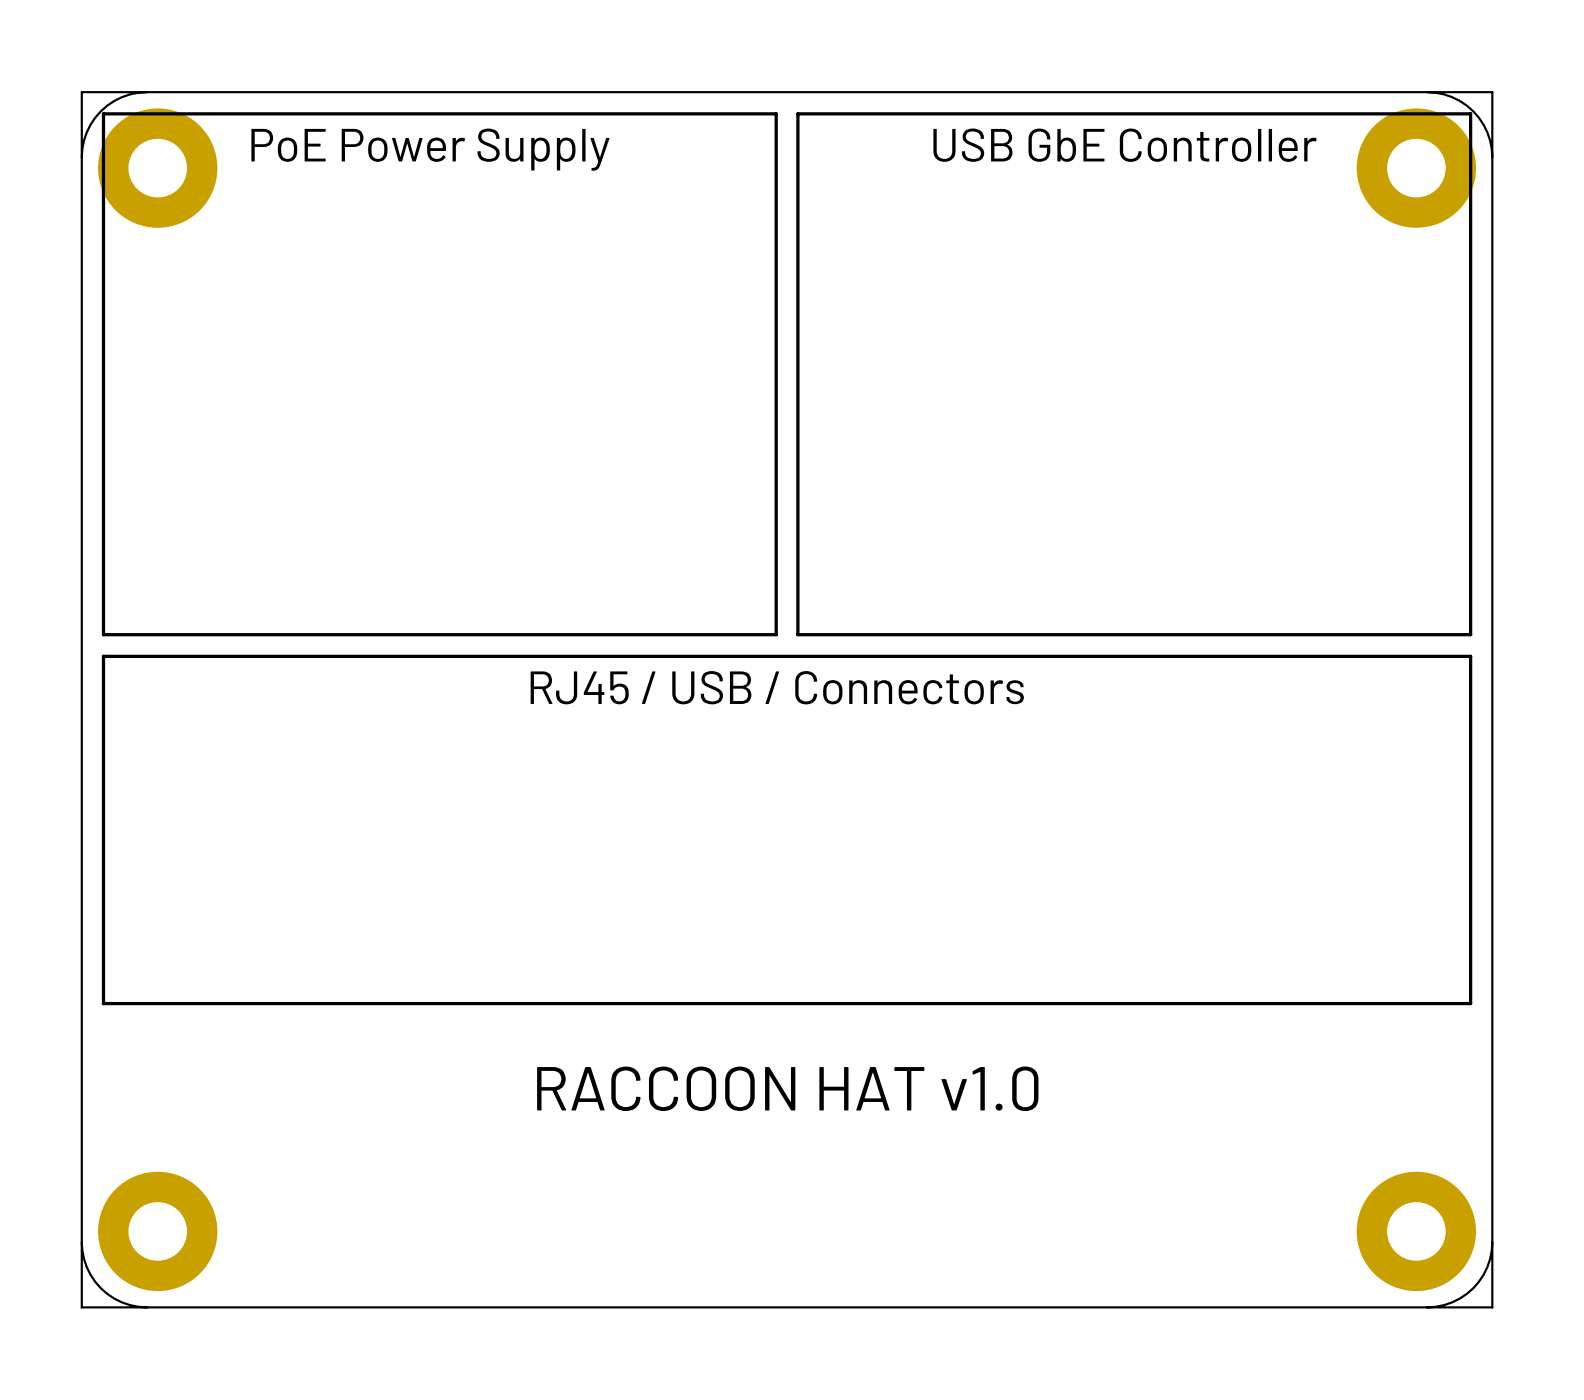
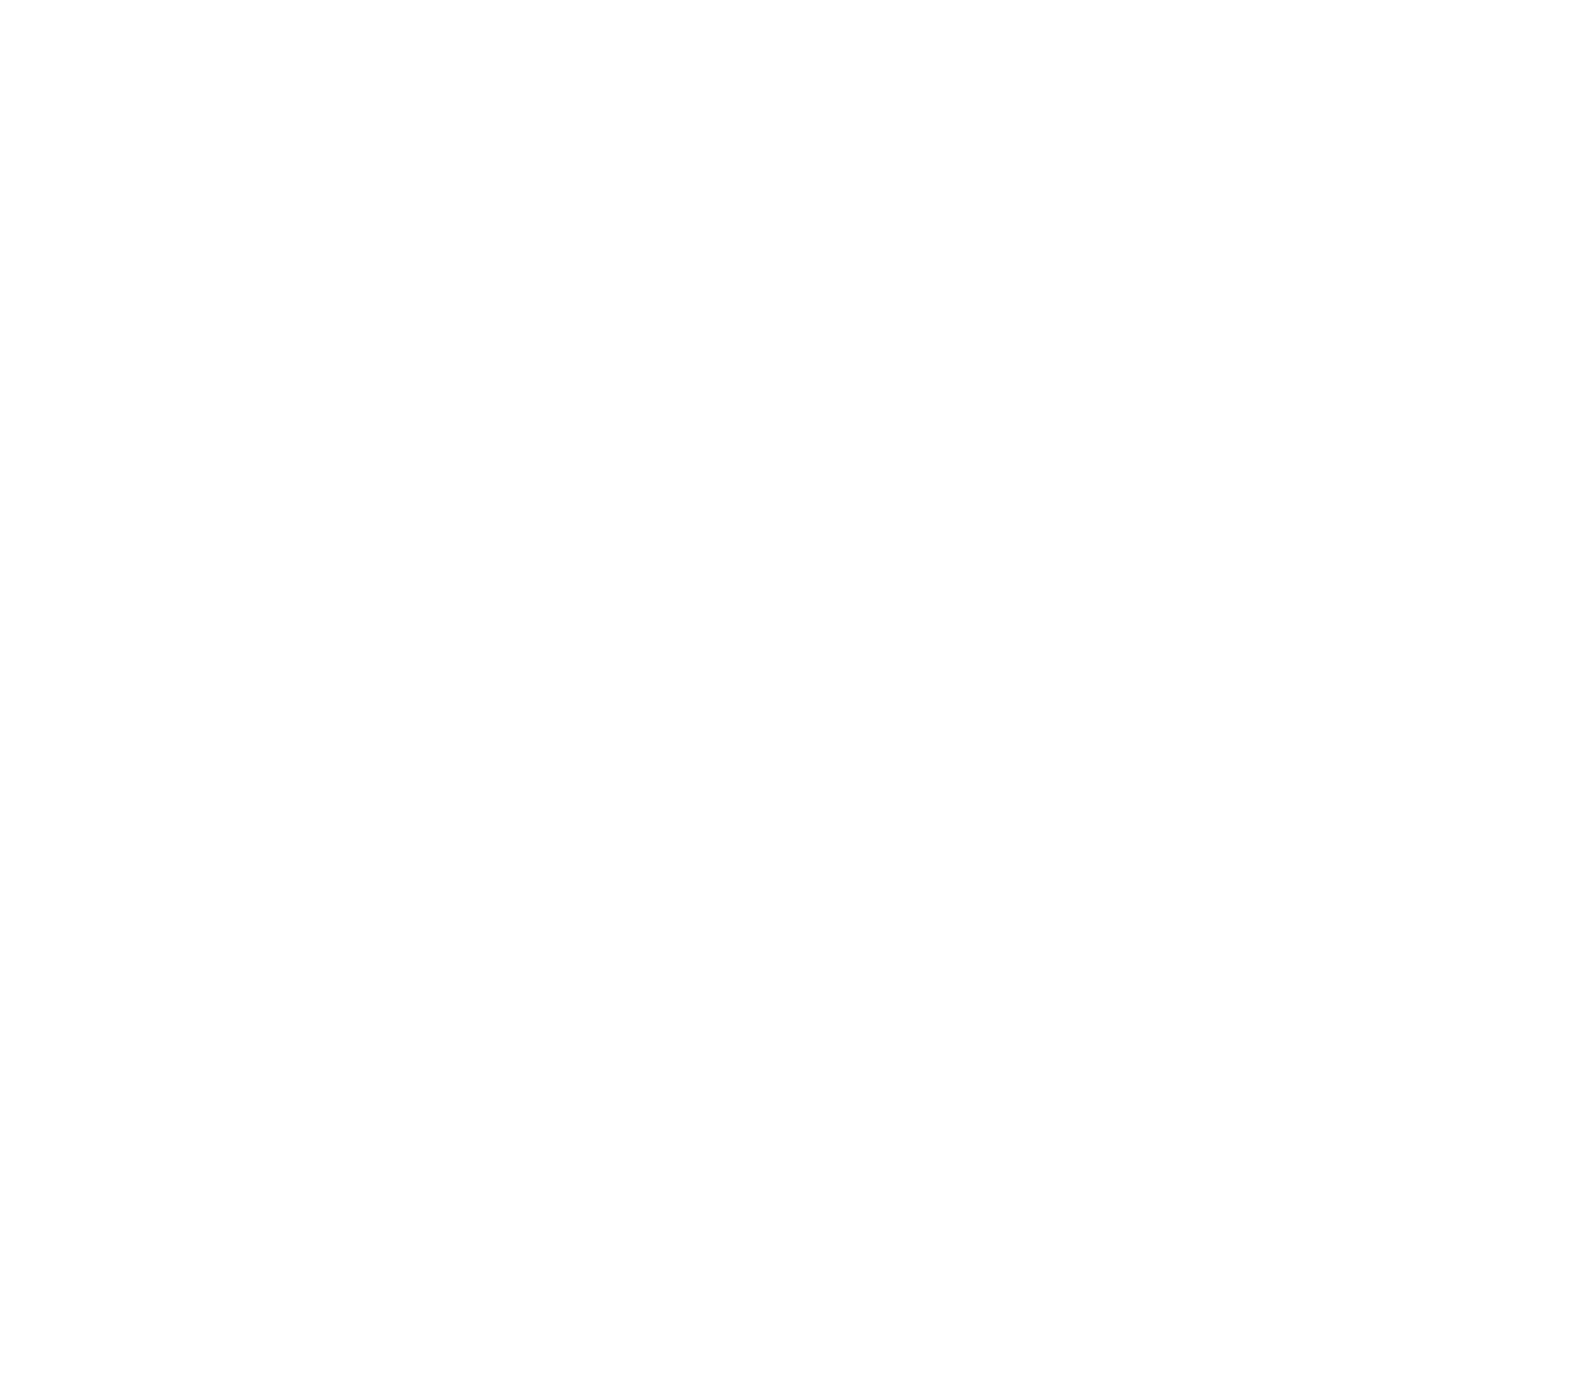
board edge: (81, 92) (1492, 92) (1492, 1307) (81, 1307) (81, 92) -> none
board edge: (146, 92) (121, 97) (100, 111) (86, 132) (81, 157) -> none
board edge: (1427, 92) (1452, 97) (1473, 111) (1487, 132) (1492, 157) -> none
line: (103, 113) (776, 113) (776, 634) (103, 634) (103, 113) -> none
line: (797, 113) (1470, 113) (1470, 634) (797, 634) (797, 113) -> none
text: USB GbE Controller (1125, 145) -> none
text: PoE Power Supply (430, 149) -> none
part: (157, 168) -> none
part: (1416, 168) -> none
line: (103, 656) (103, 1003) (1470, 1003) (1470, 656) (103, 656) -> none
text: RJ45 / USB / Connectors (777, 687) -> none
text: RACCOON HAT v1.0 (787, 1088) -> none
part: (157, 1231) -> none
part: (1416, 1231) -> none
board edge: (81, 1242) (86, 1267) (100, 1288) (121, 1302) (146, 1307) -> none
board edge: (1492, 1242) (1487, 1267) (1473, 1288) (1452, 1302) (1427, 1307) -> none

